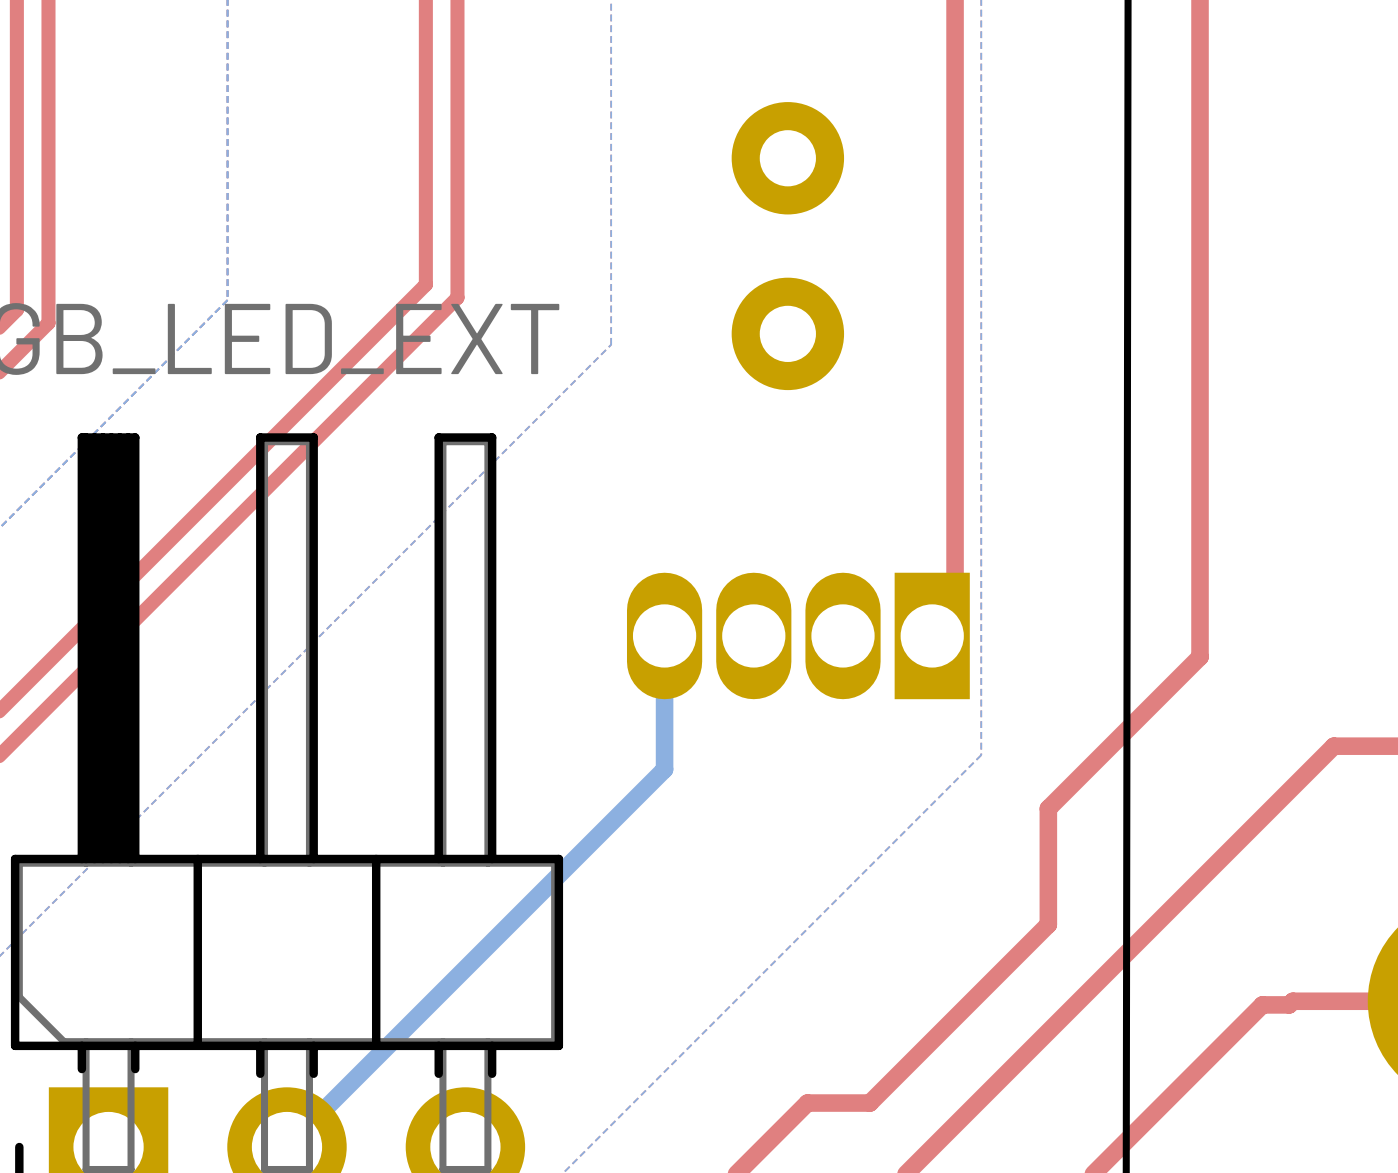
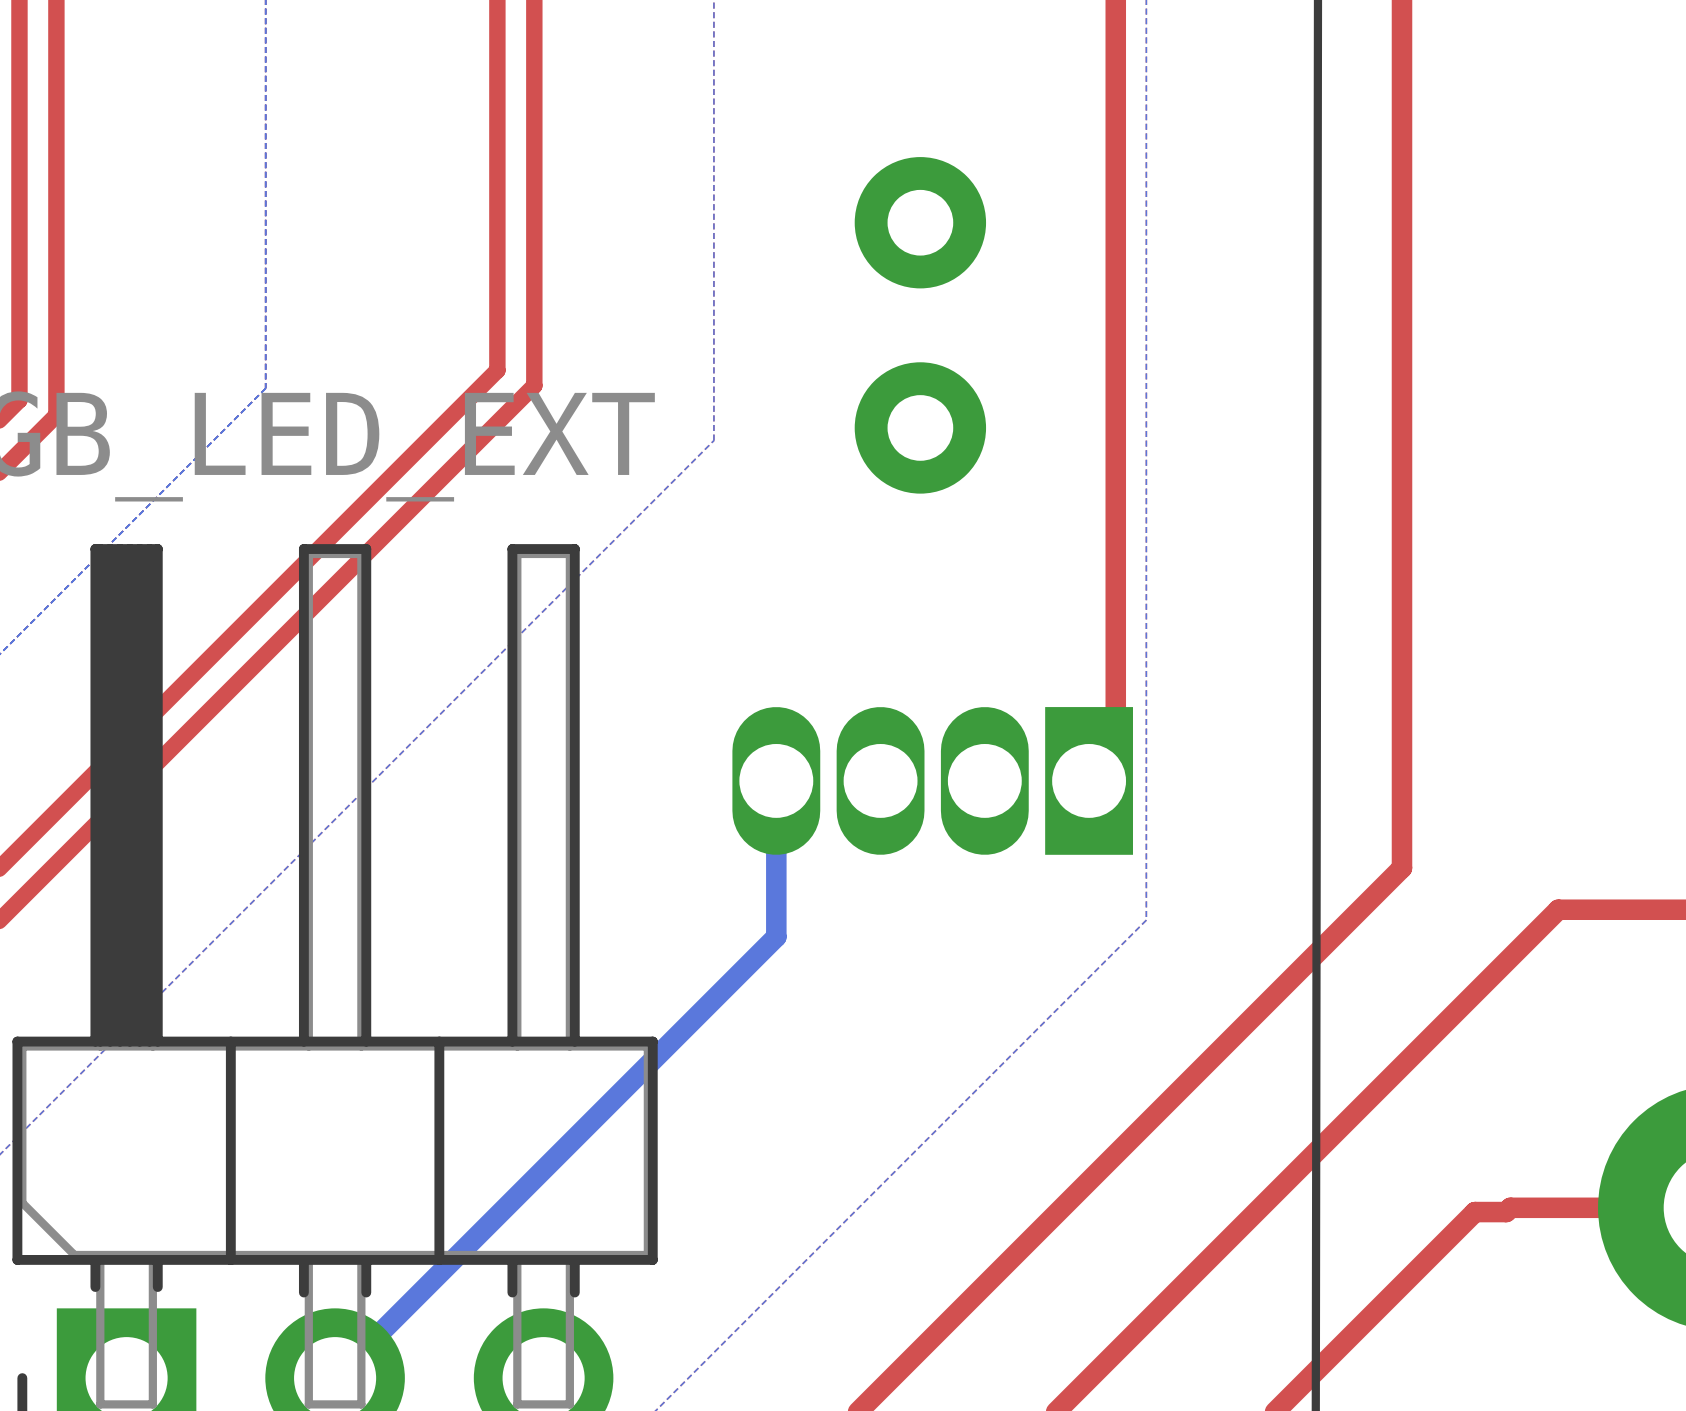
top track: (1200, 656) (1048, 808) (1048, 924) (869, 1103) (807, 1103) -> (1402, 805) (1402, 868) (943, 1326)

